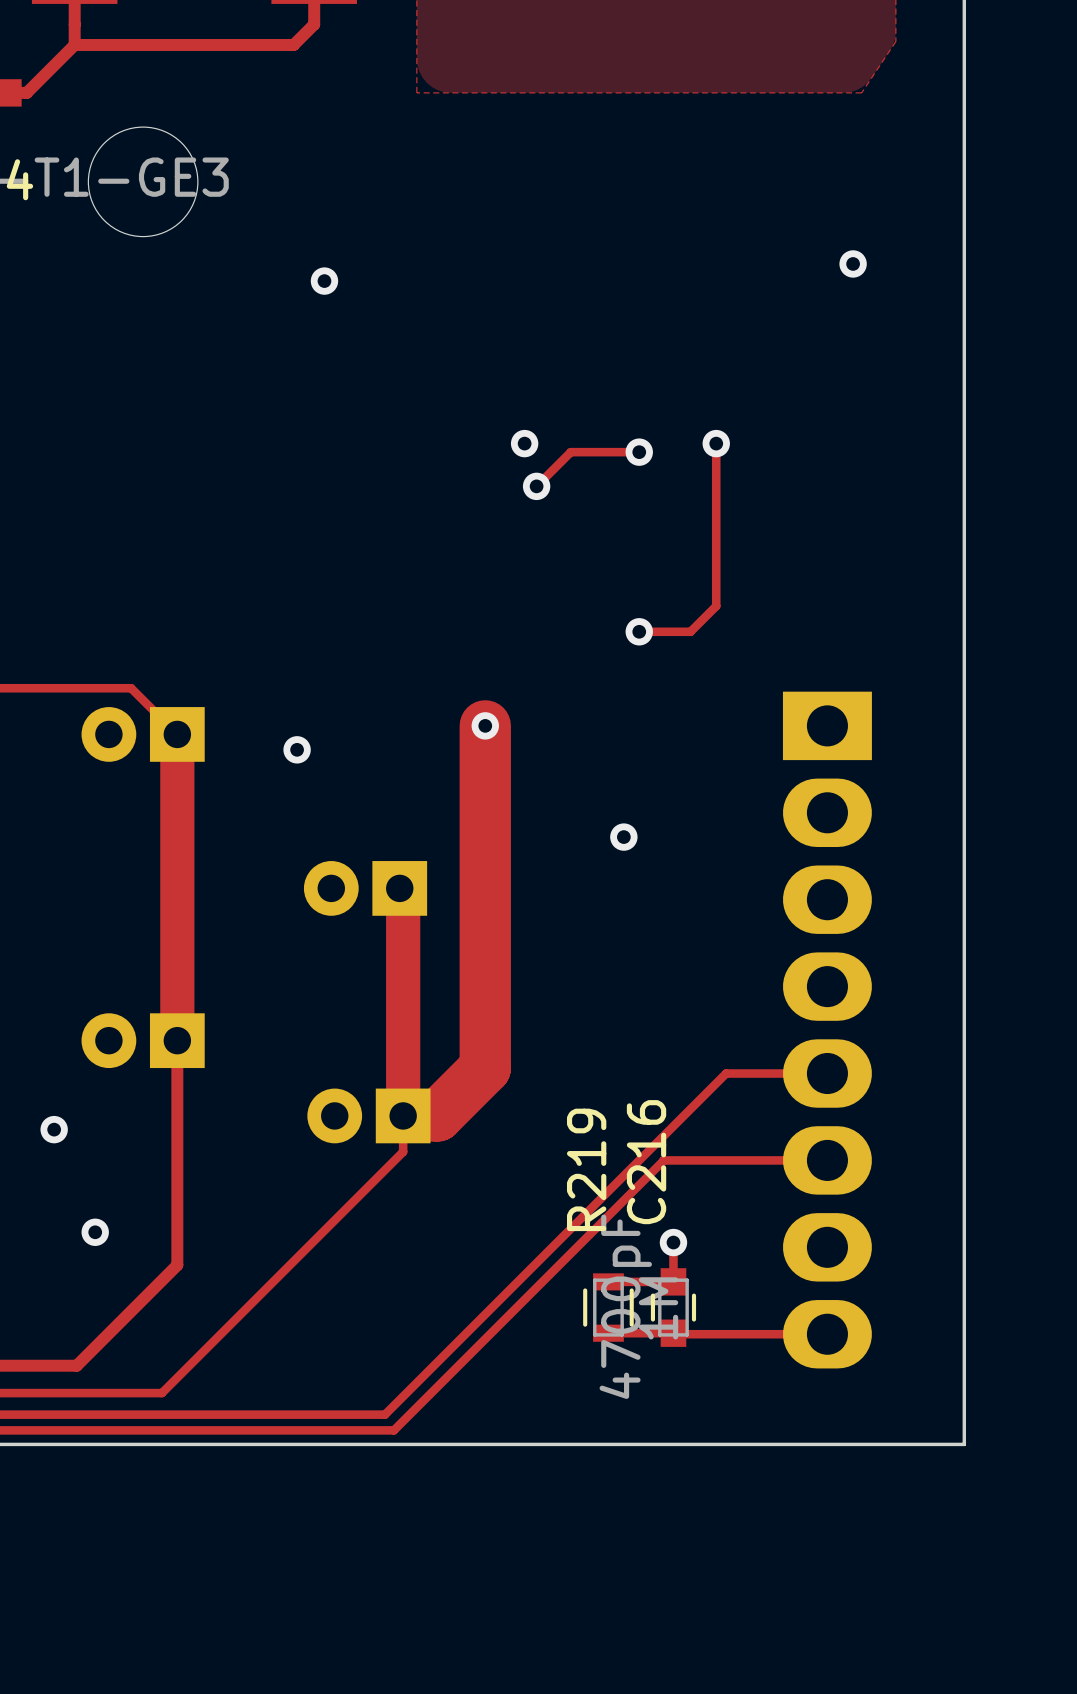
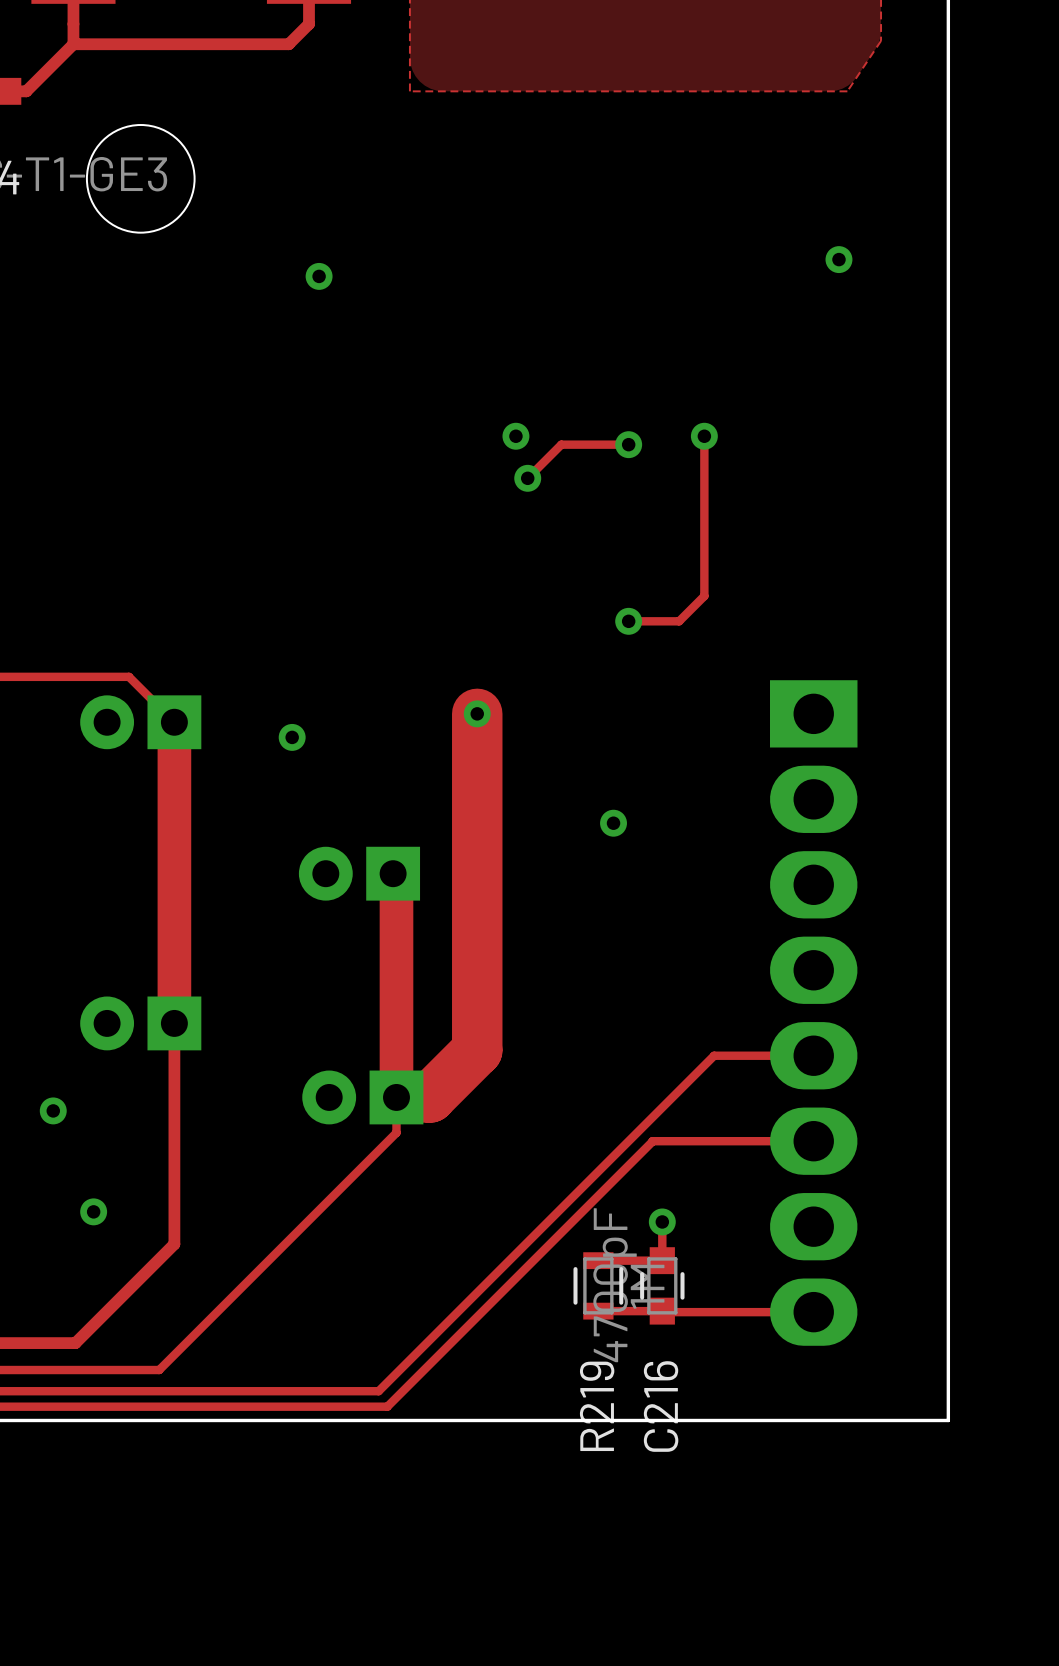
C216 name position: C216 (646, 1162) -> C216 (661, 1406)
R219 name position: R219 (586, 1169) -> R219 (597, 1406)

